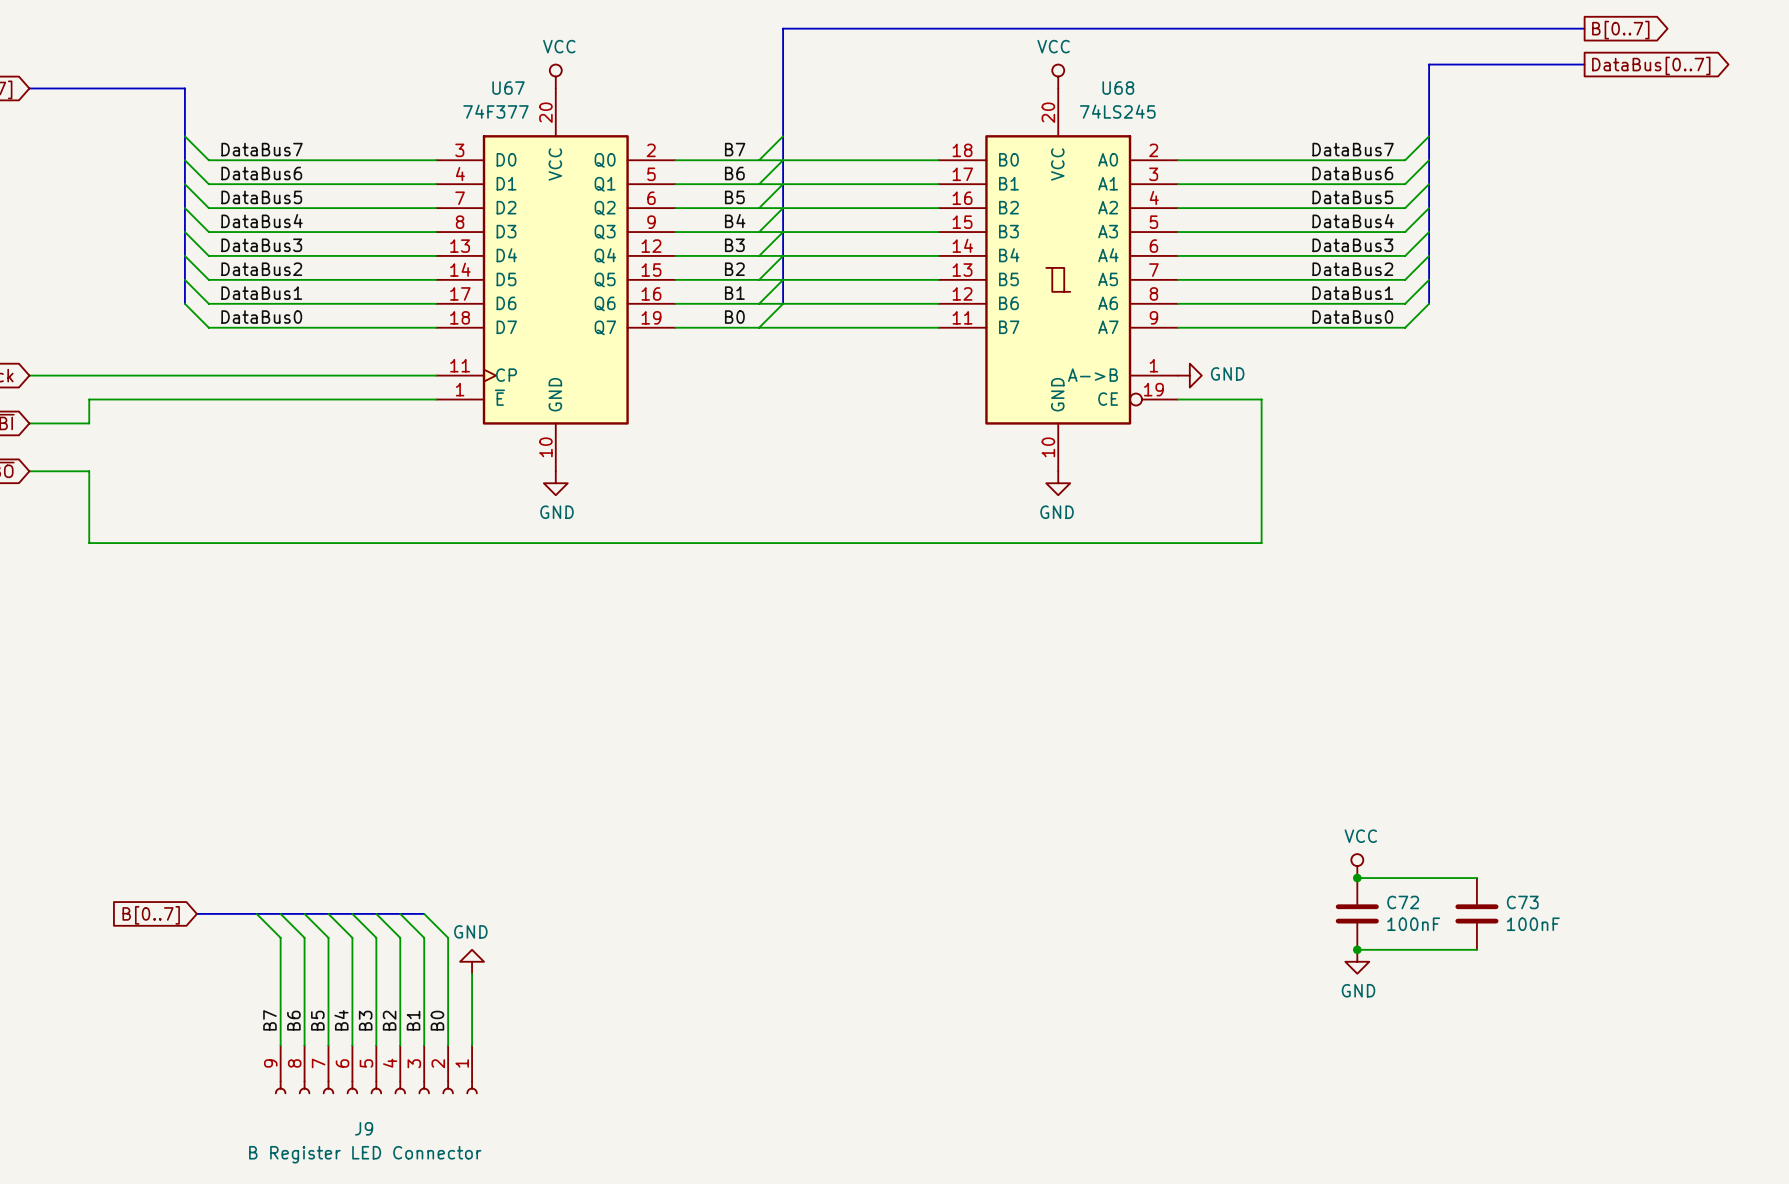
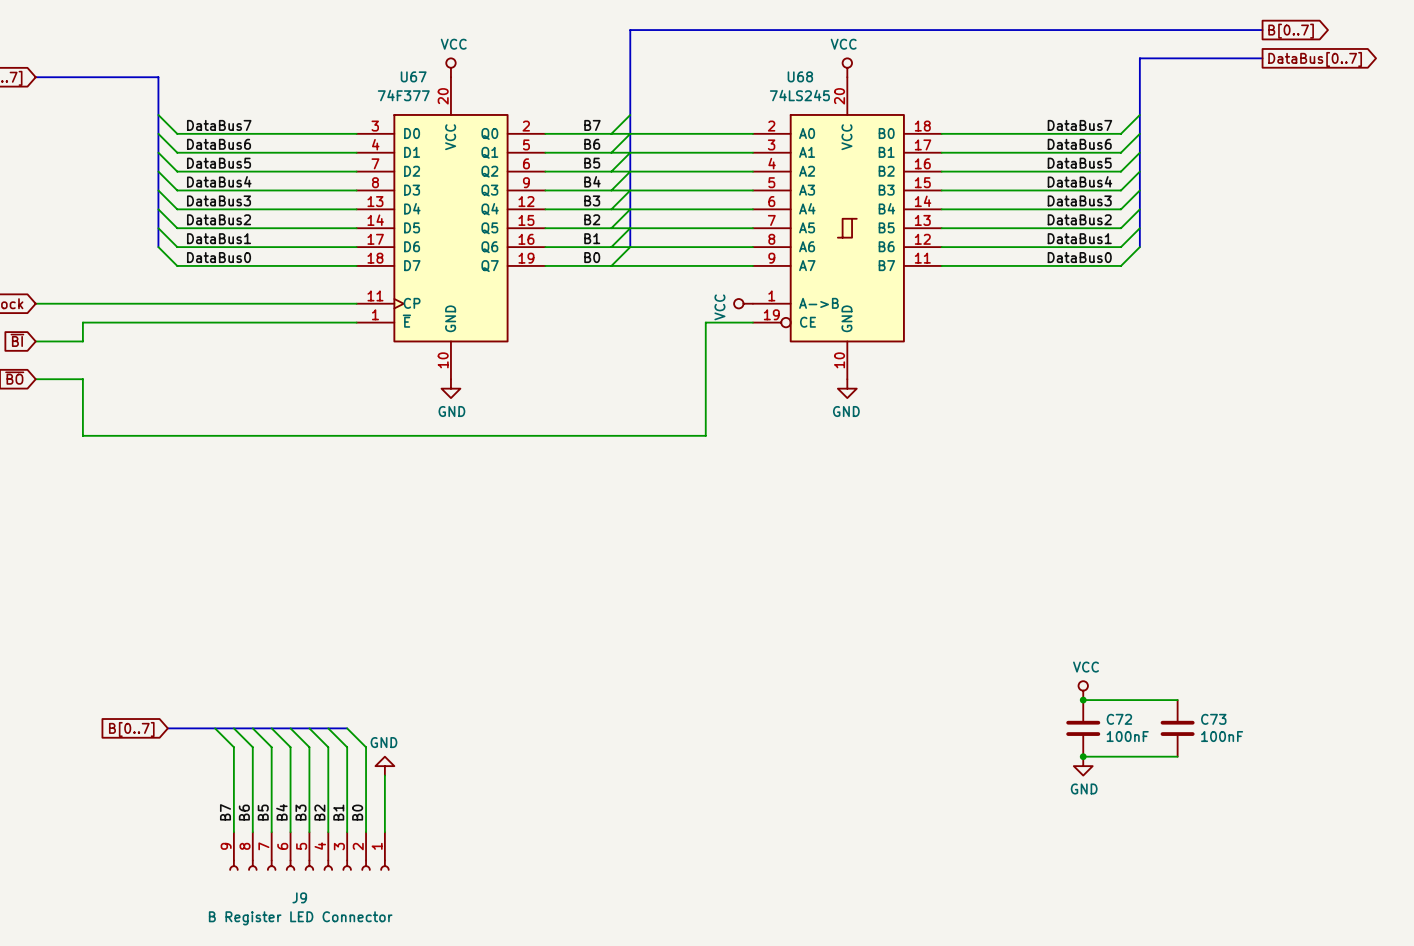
U68 flip: as is (1058, 279) -> left-right (847, 228)
power symbol: none -> VCC (743, 303)
power symbol: GND (1189, 375) -> none
wire: (1177, 399) (1261, 399) (1261, 543) (878, 543) -> (752, 322) (705, 322) (705, 435)

